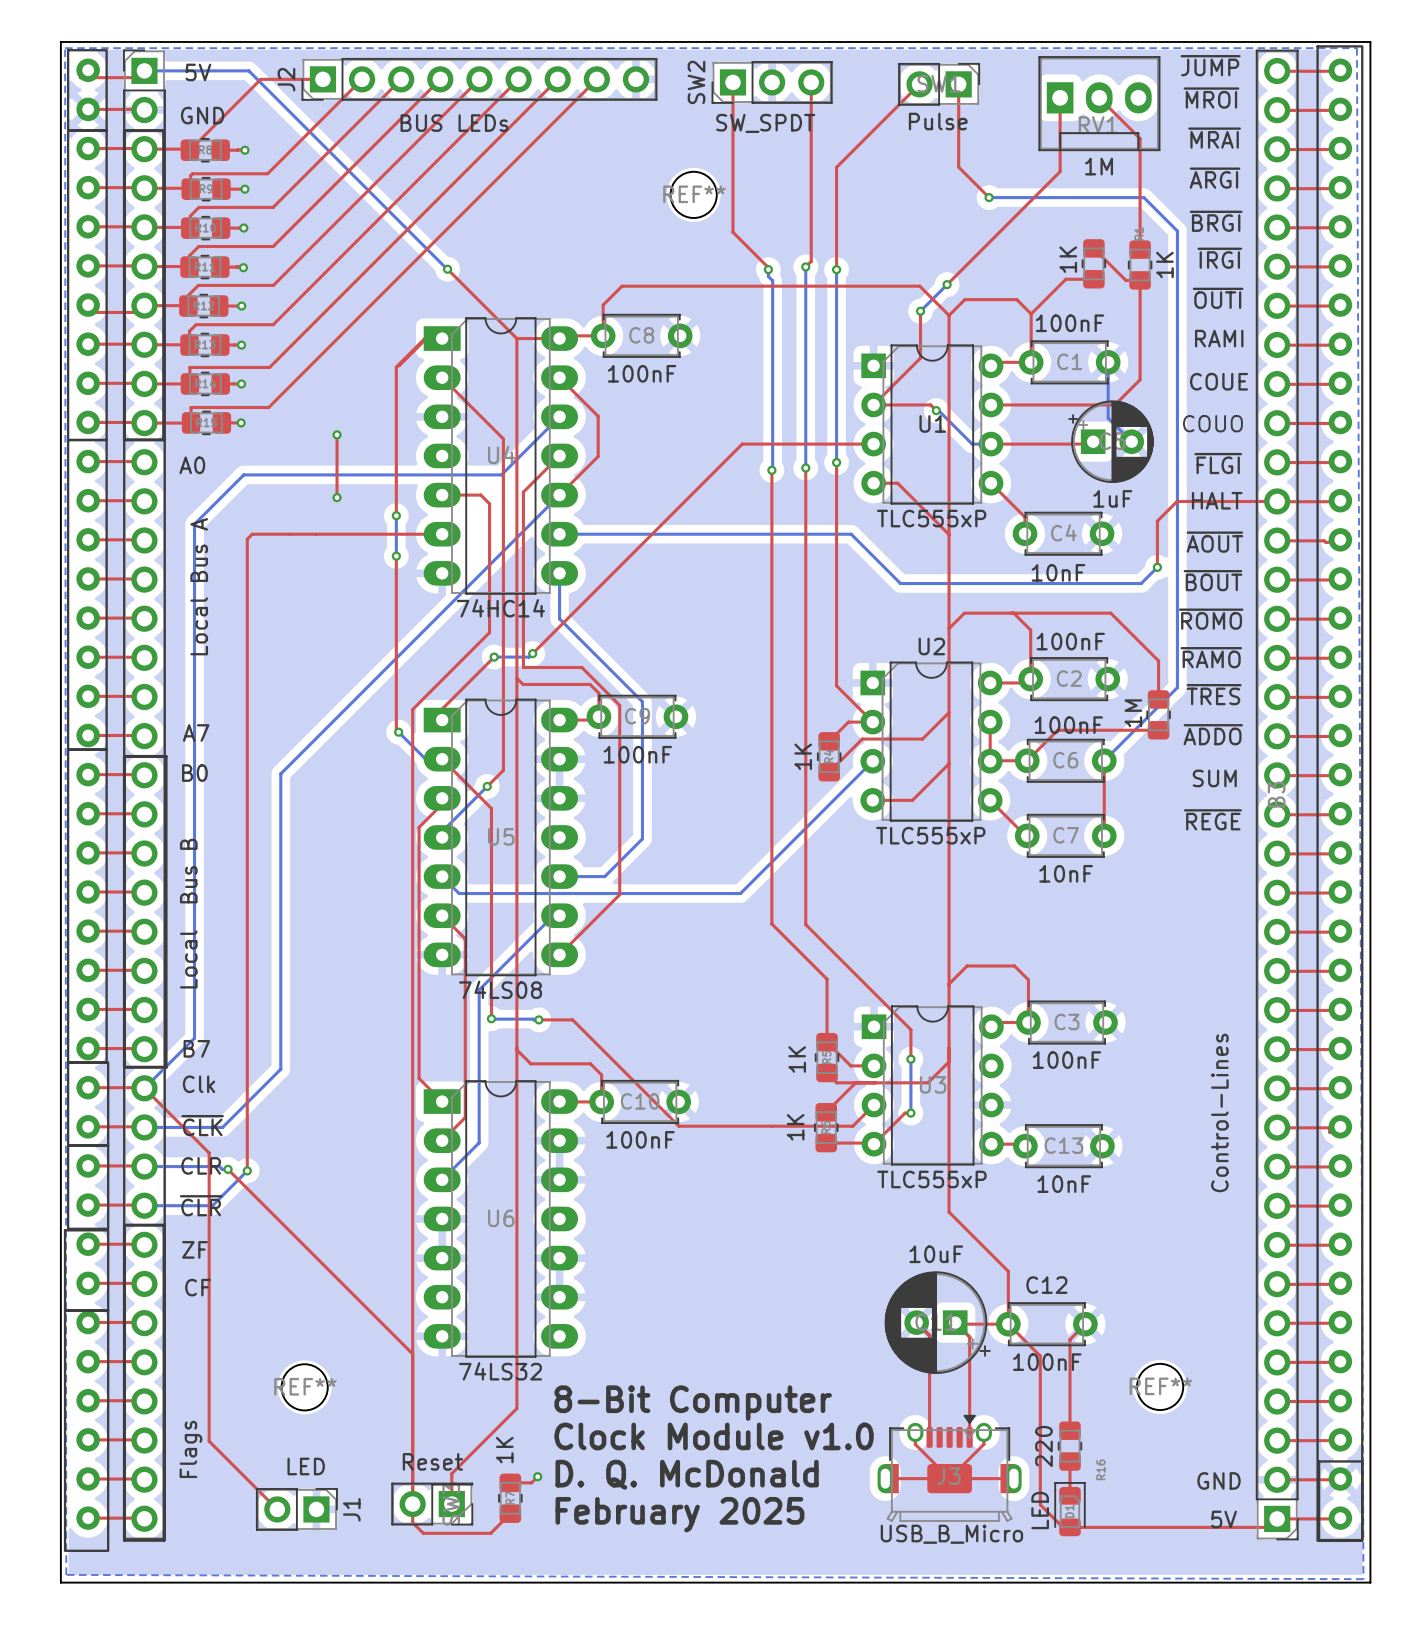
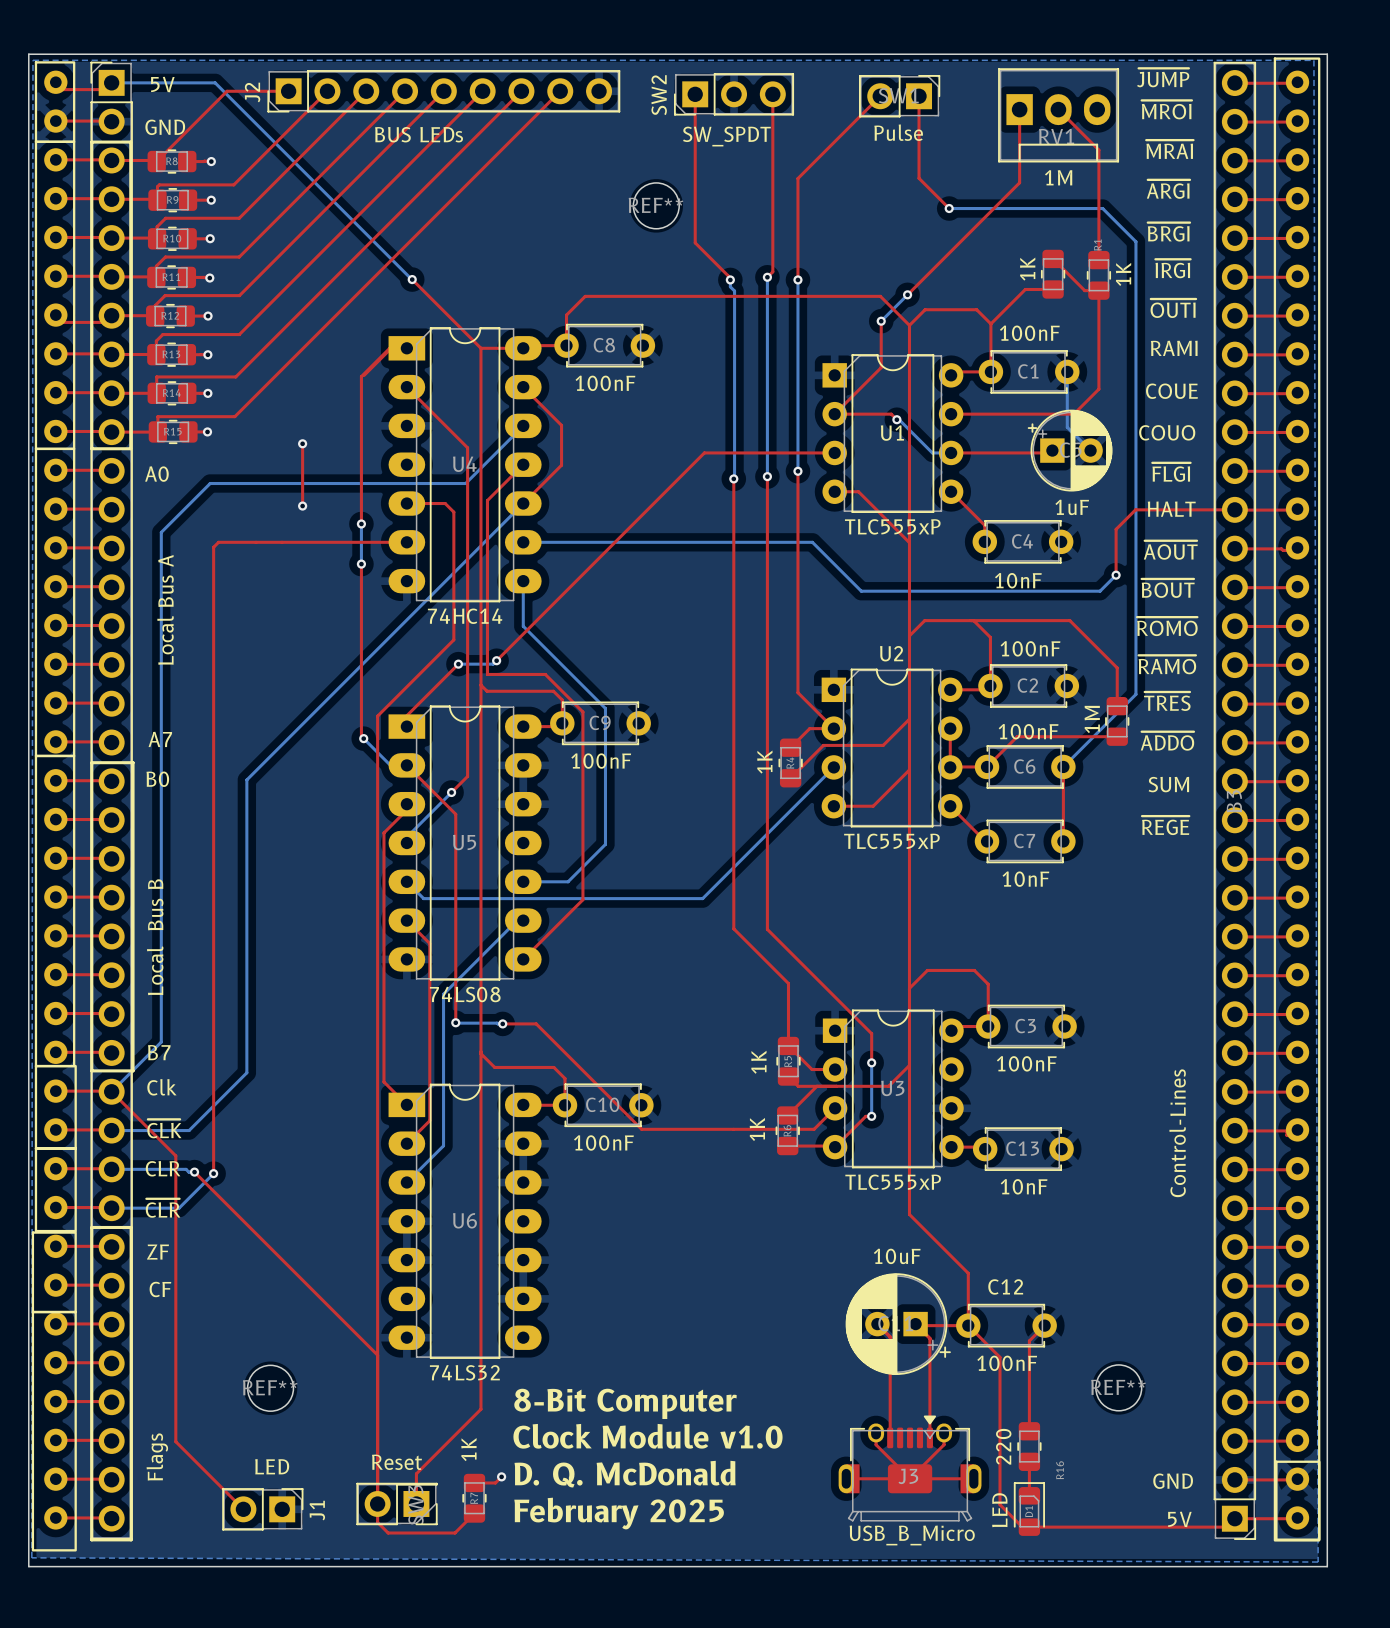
bottom zone outline: (65, 48) (66, 1574) (1363, 1579) (1356, 48) -> (32, 60) (31, 1557) (1318, 1562) (1313, 60)
board edge: (60, 1567) (60, 1582) (1370, 1582) (1370, 1567) -> (28, 1566) (1327, 1566)

